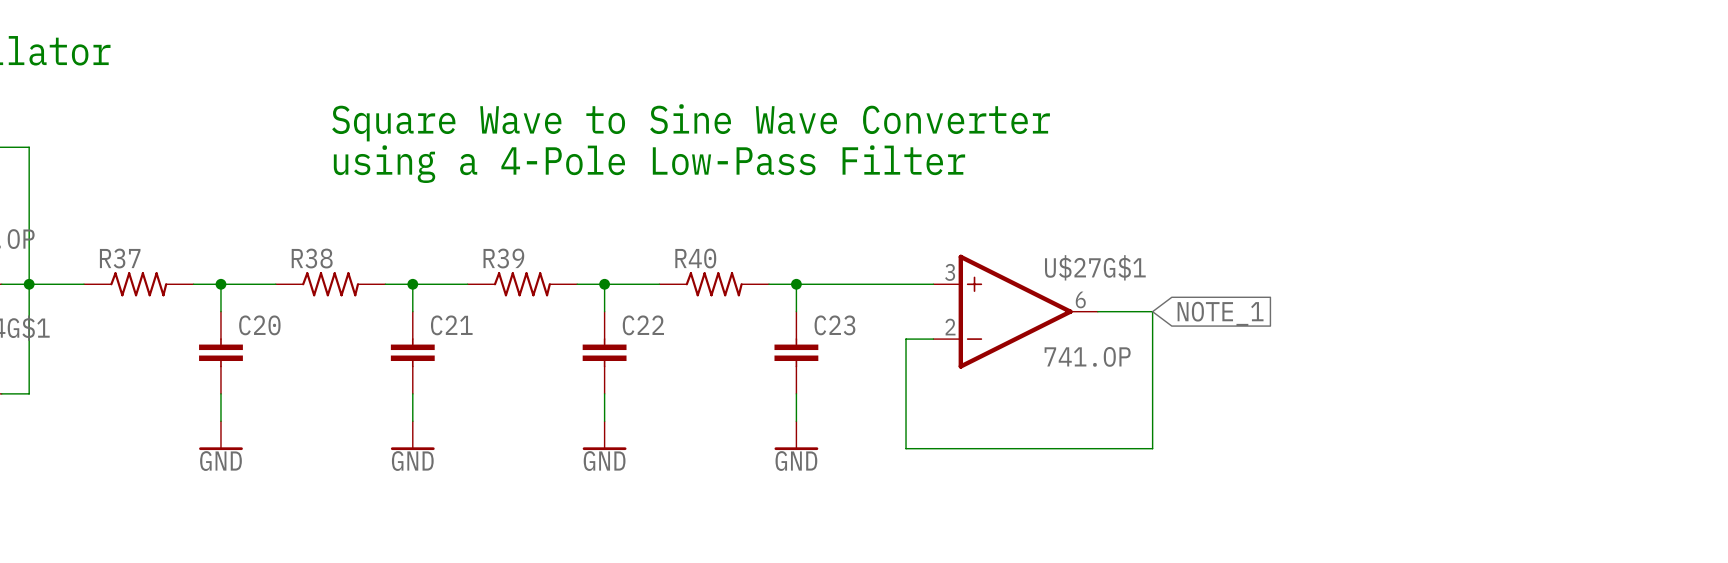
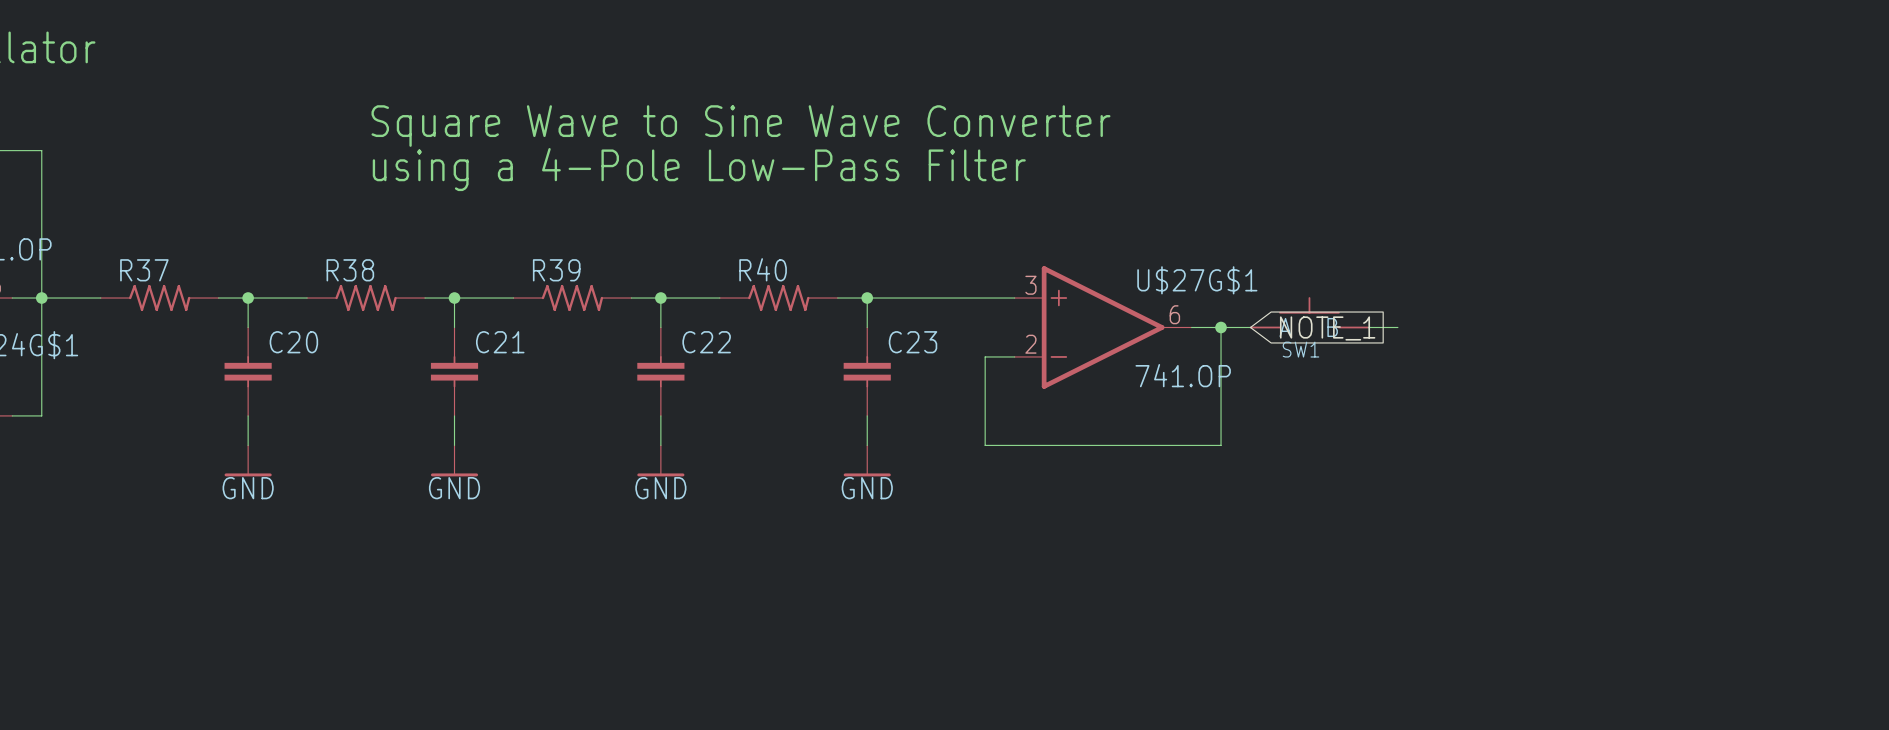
SW1: none -> (1309, 312)
junction: none -> (1221, 327)
wire: (1152, 311) (1152, 448) (906, 448) (906, 421) -> (1221, 327) (1221, 445) (985, 445)
wire: none -> (1368, 327) (1397, 327)

